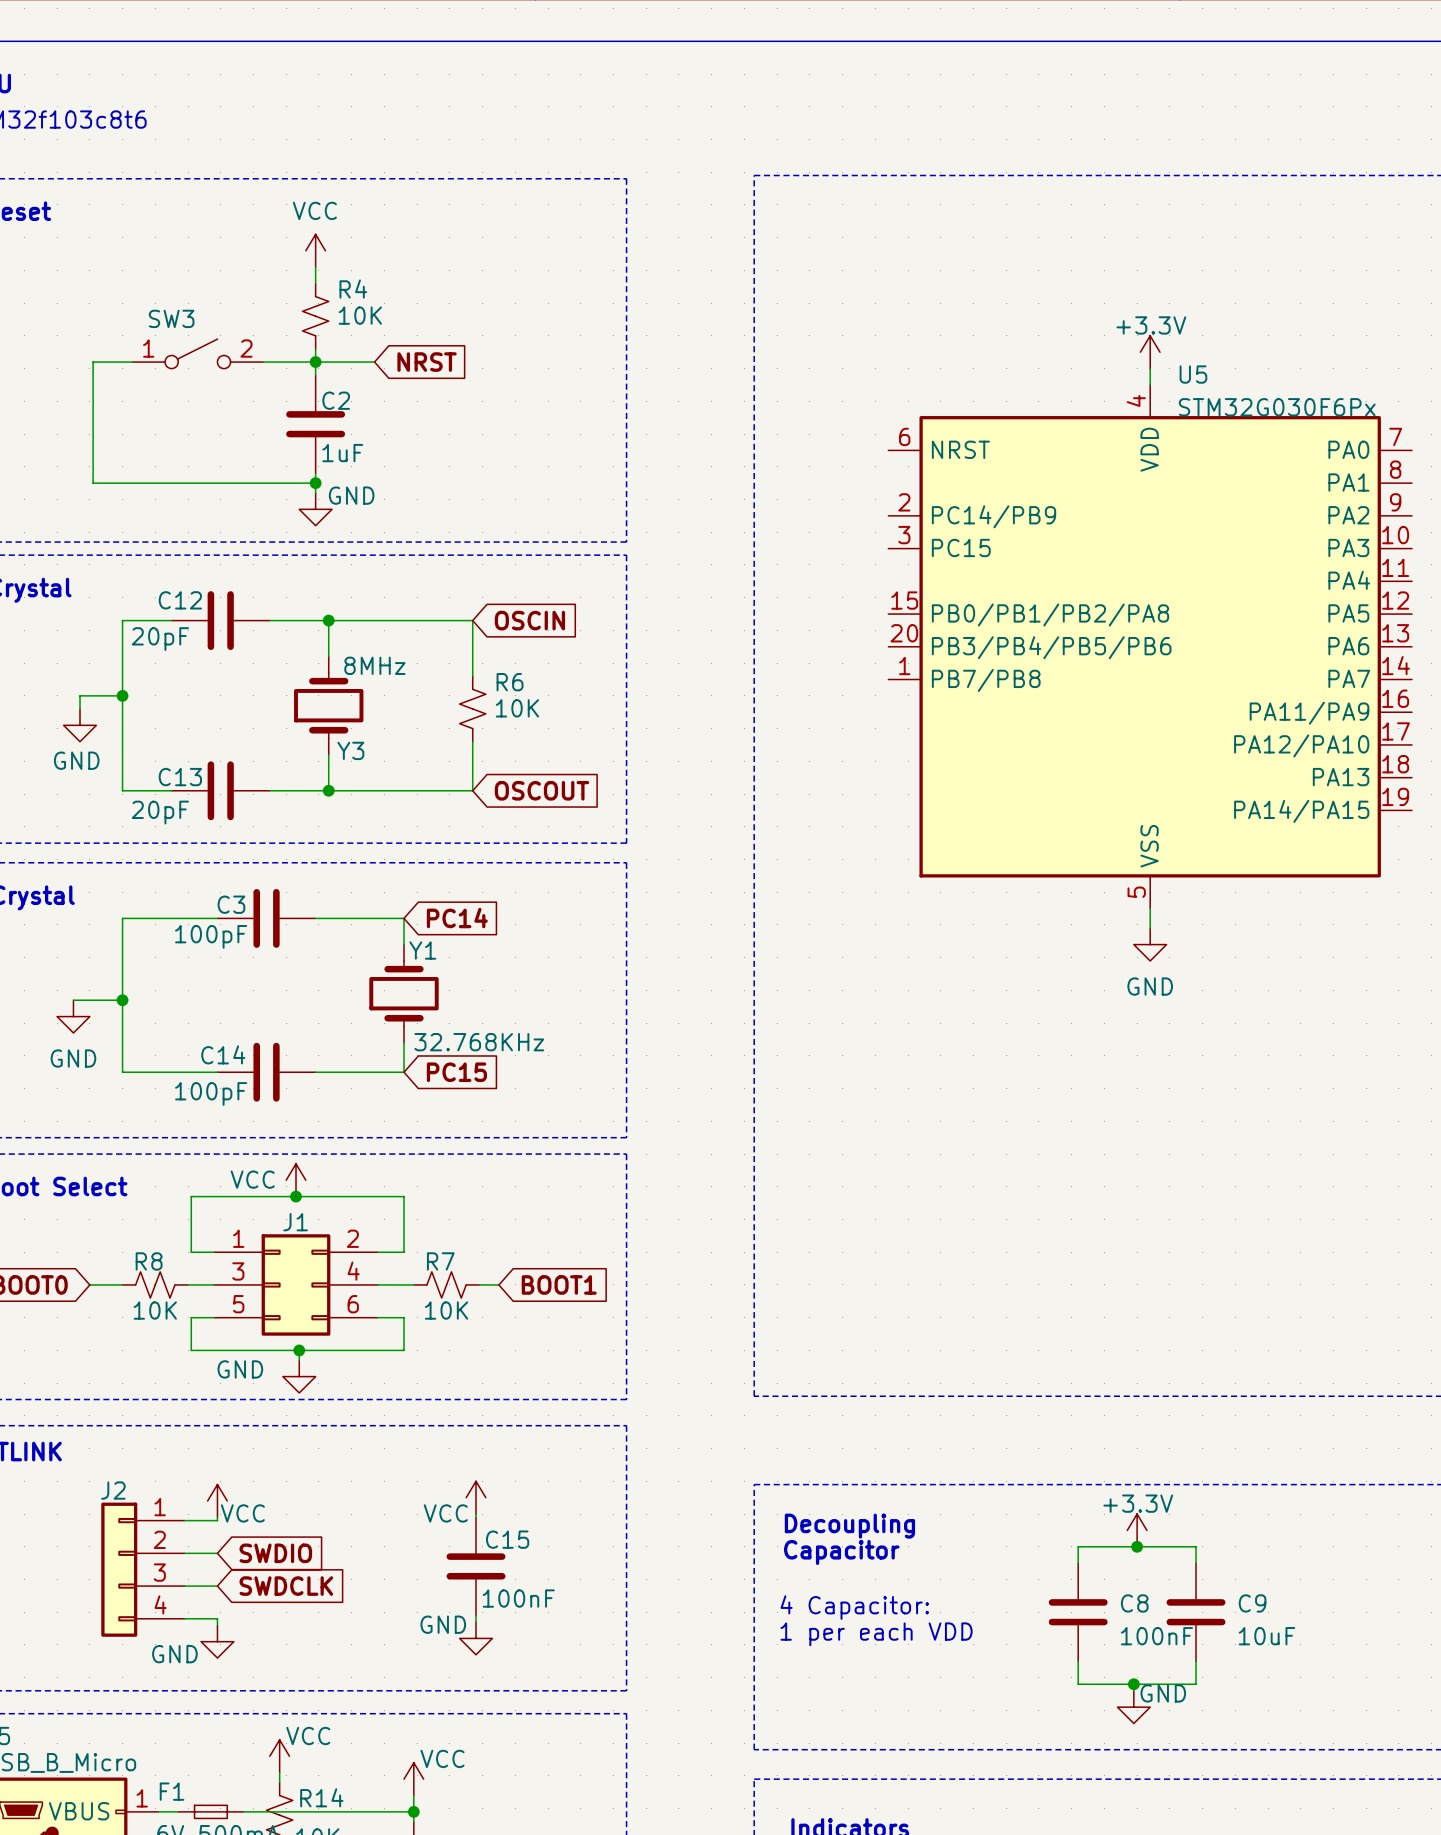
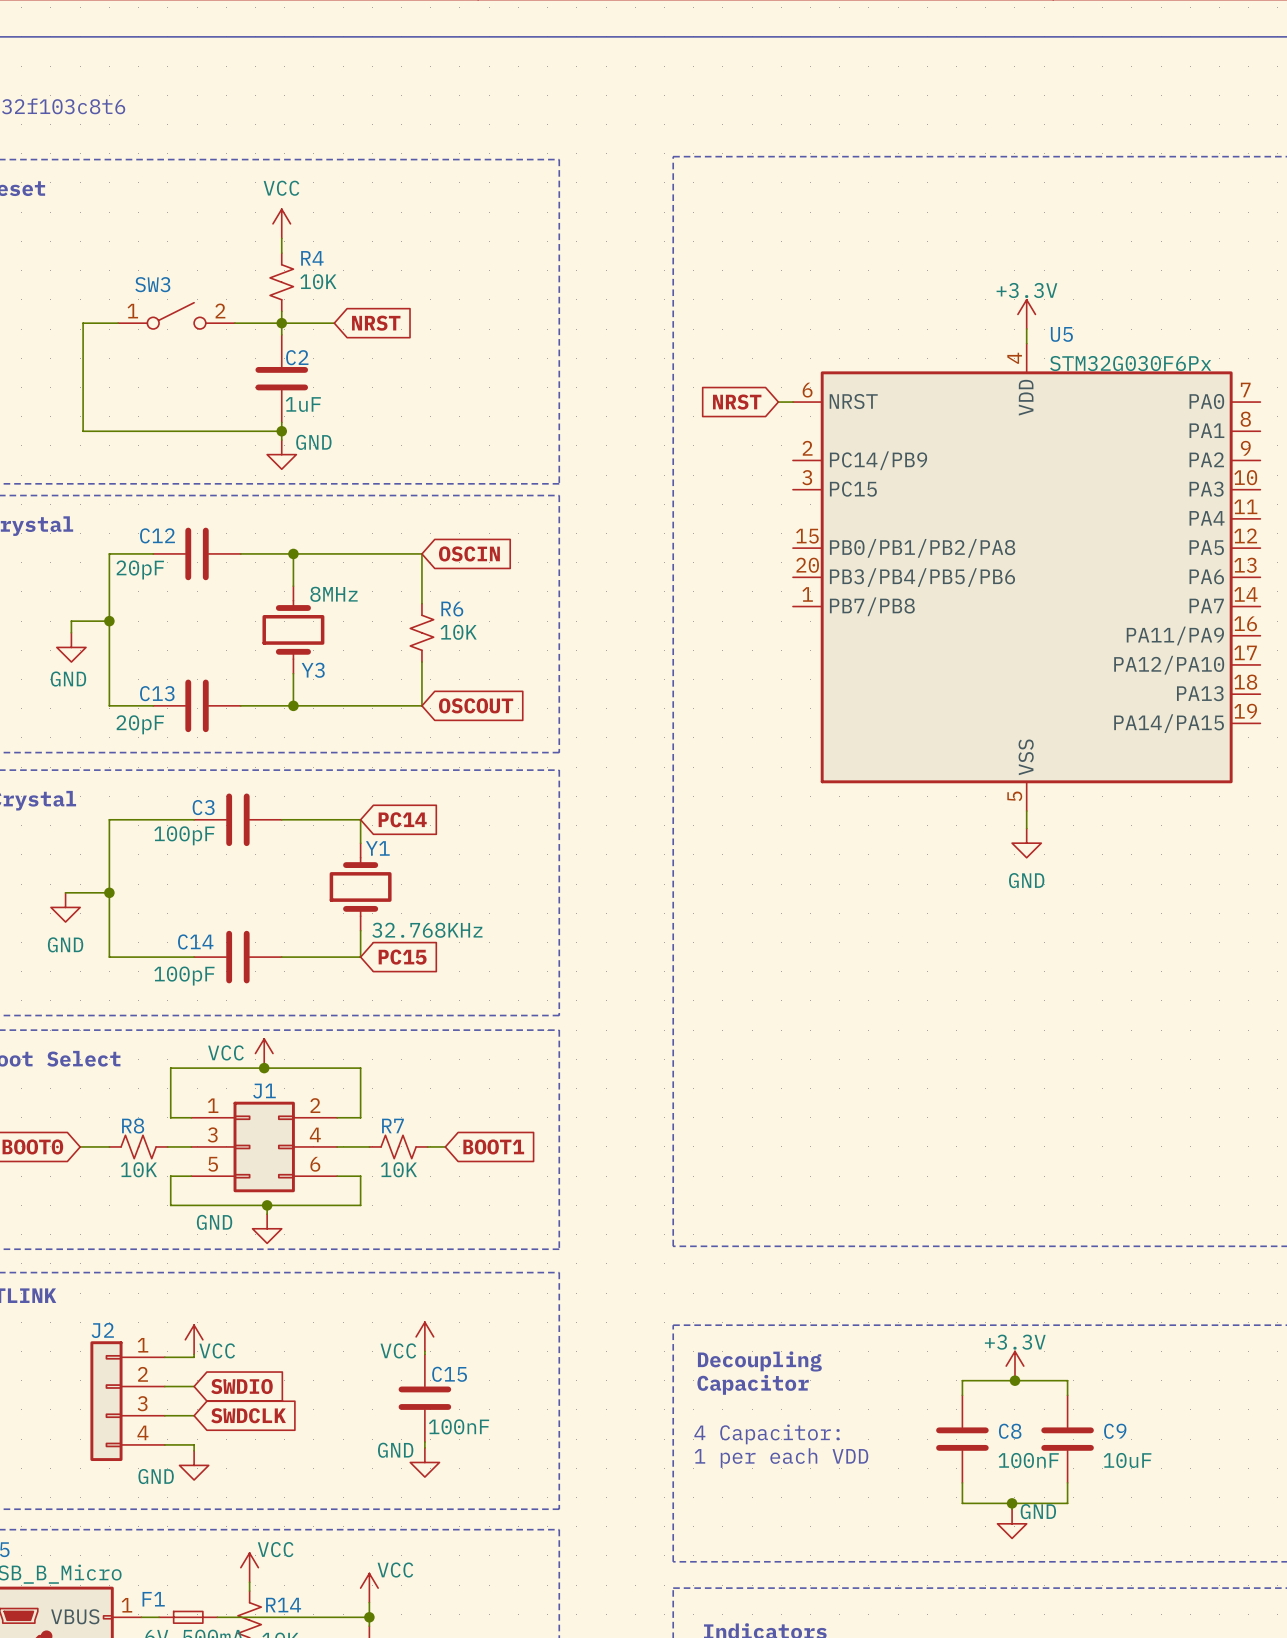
global label: none -> NRST (737, 402)
wire: none -> (778, 402) (792, 402)

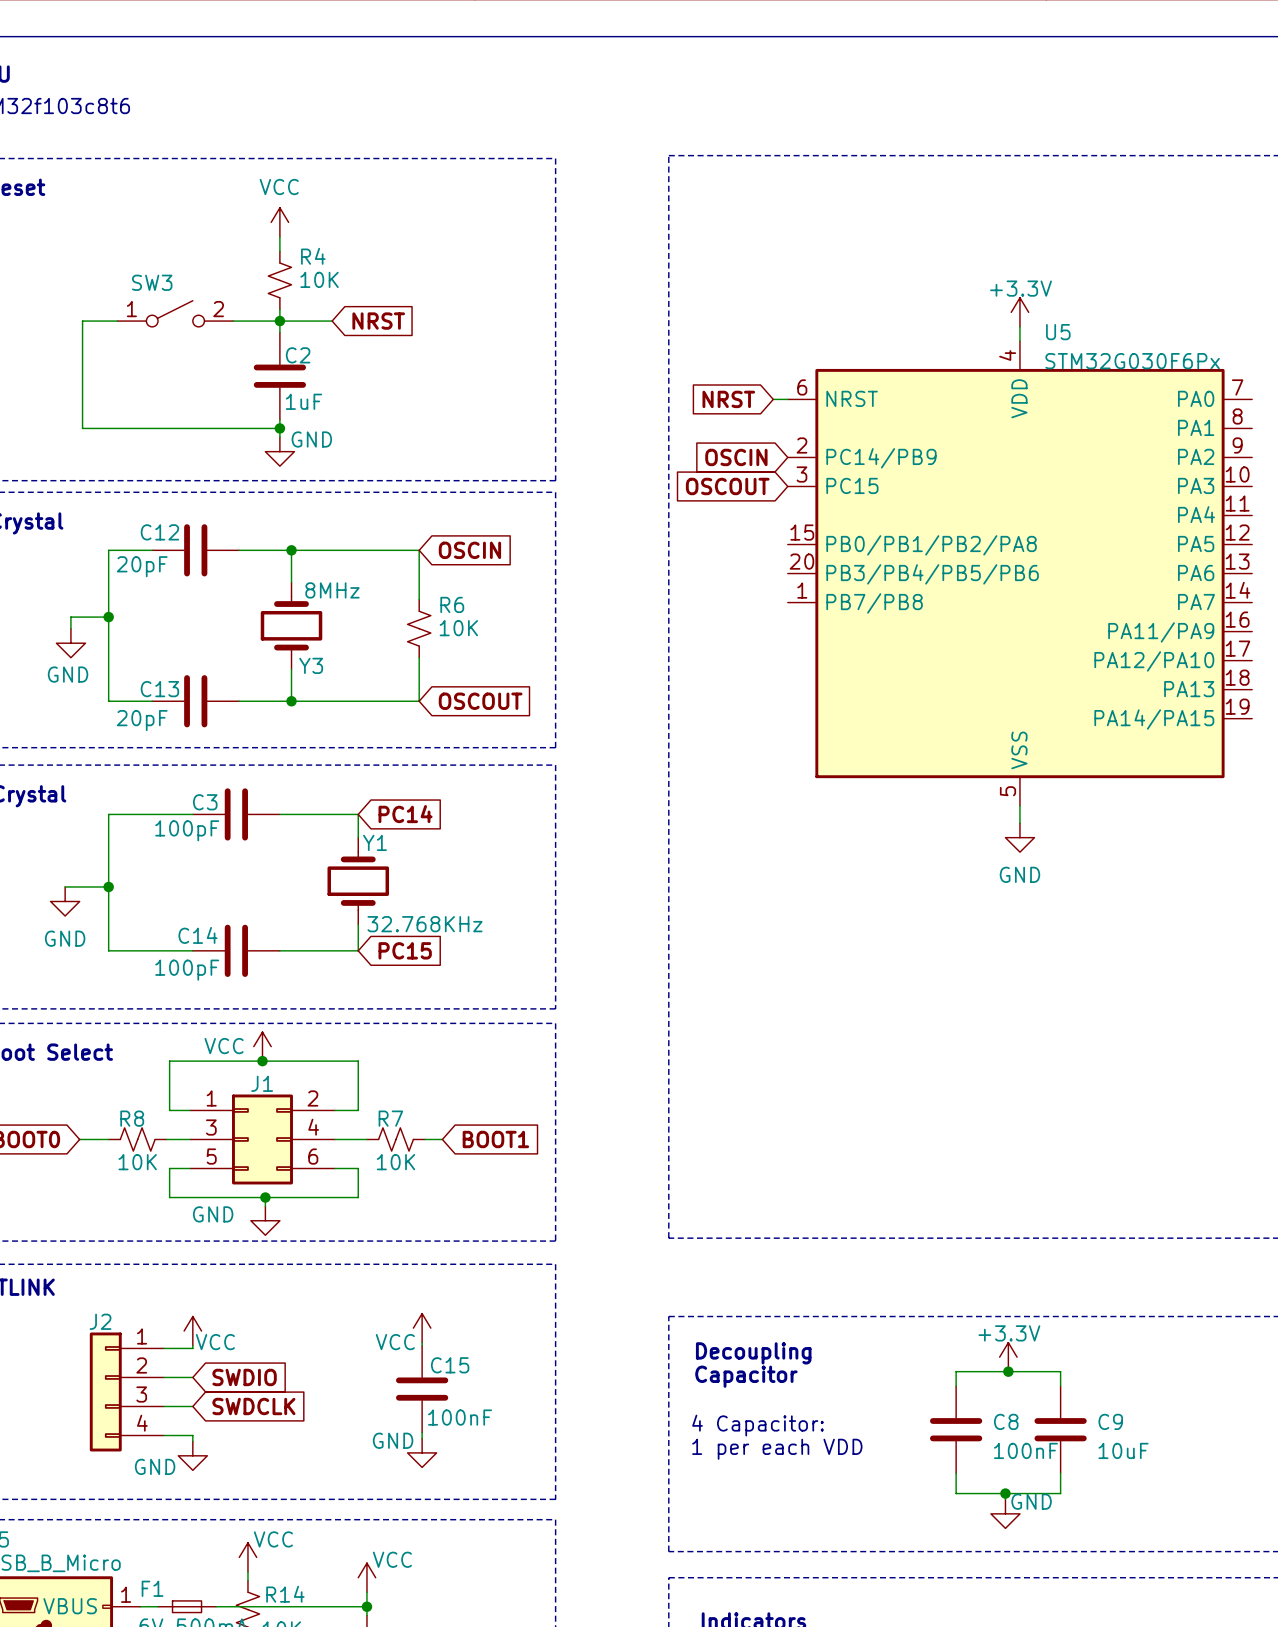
global label: none -> OSCIN (736, 457)
global label: none -> OSCOUT (727, 486)

